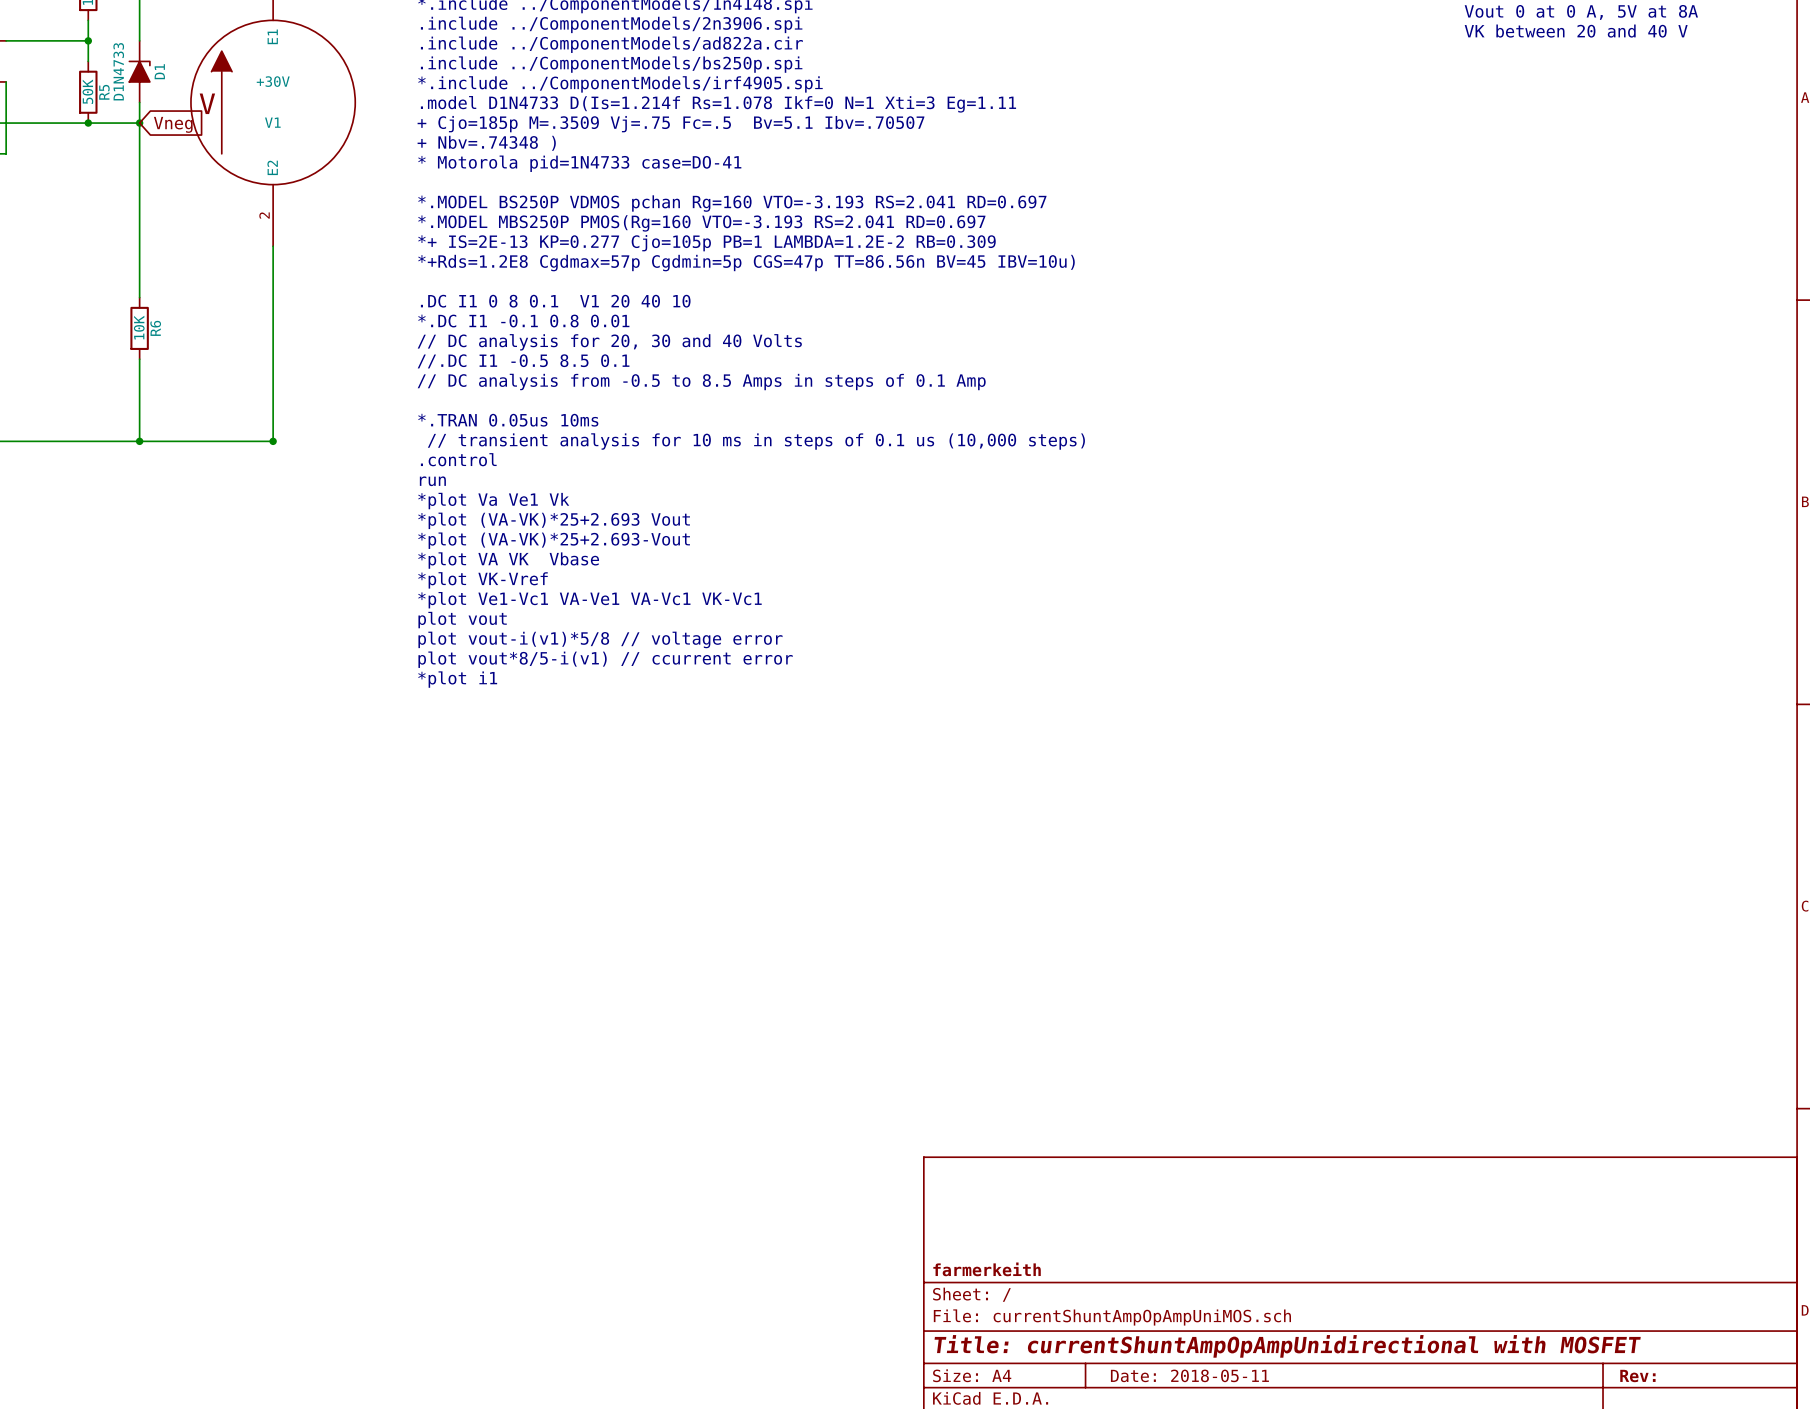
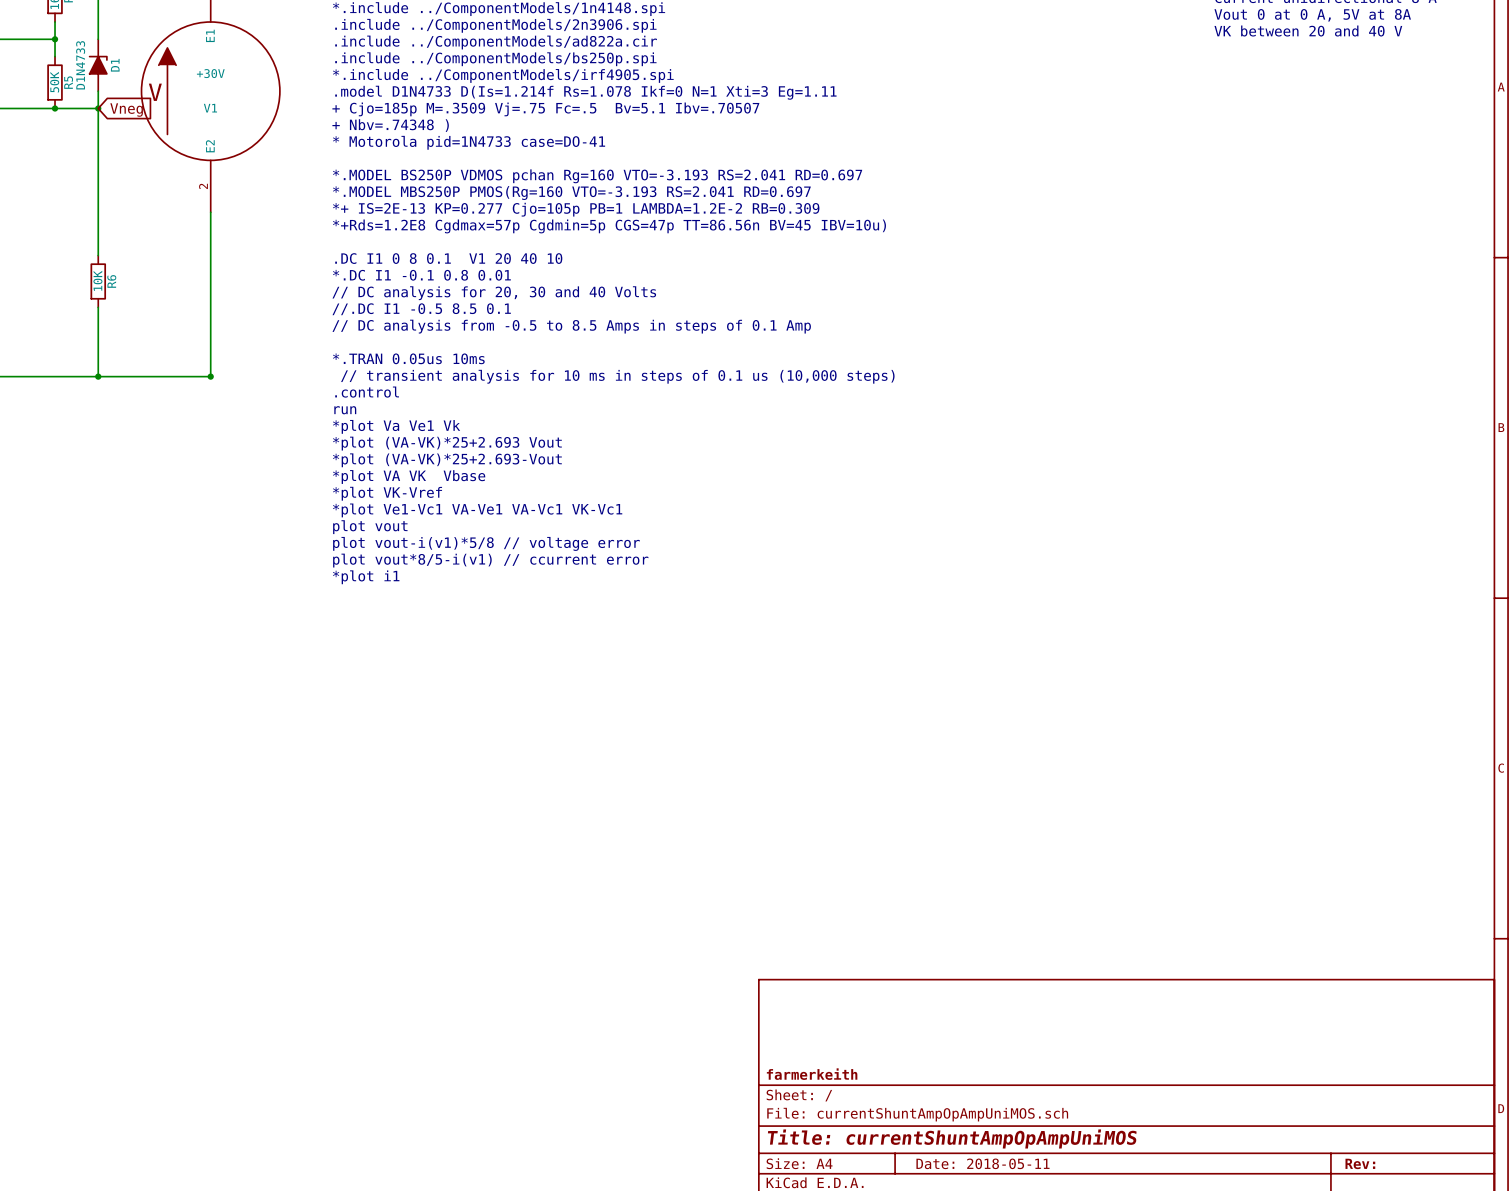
title block: Title: currentShuntAmpOpAmpUnidirectional with MOSFET (1287, 1346) -> Title: currentShuntAmpOpAmpUniMOS (952, 1138)

